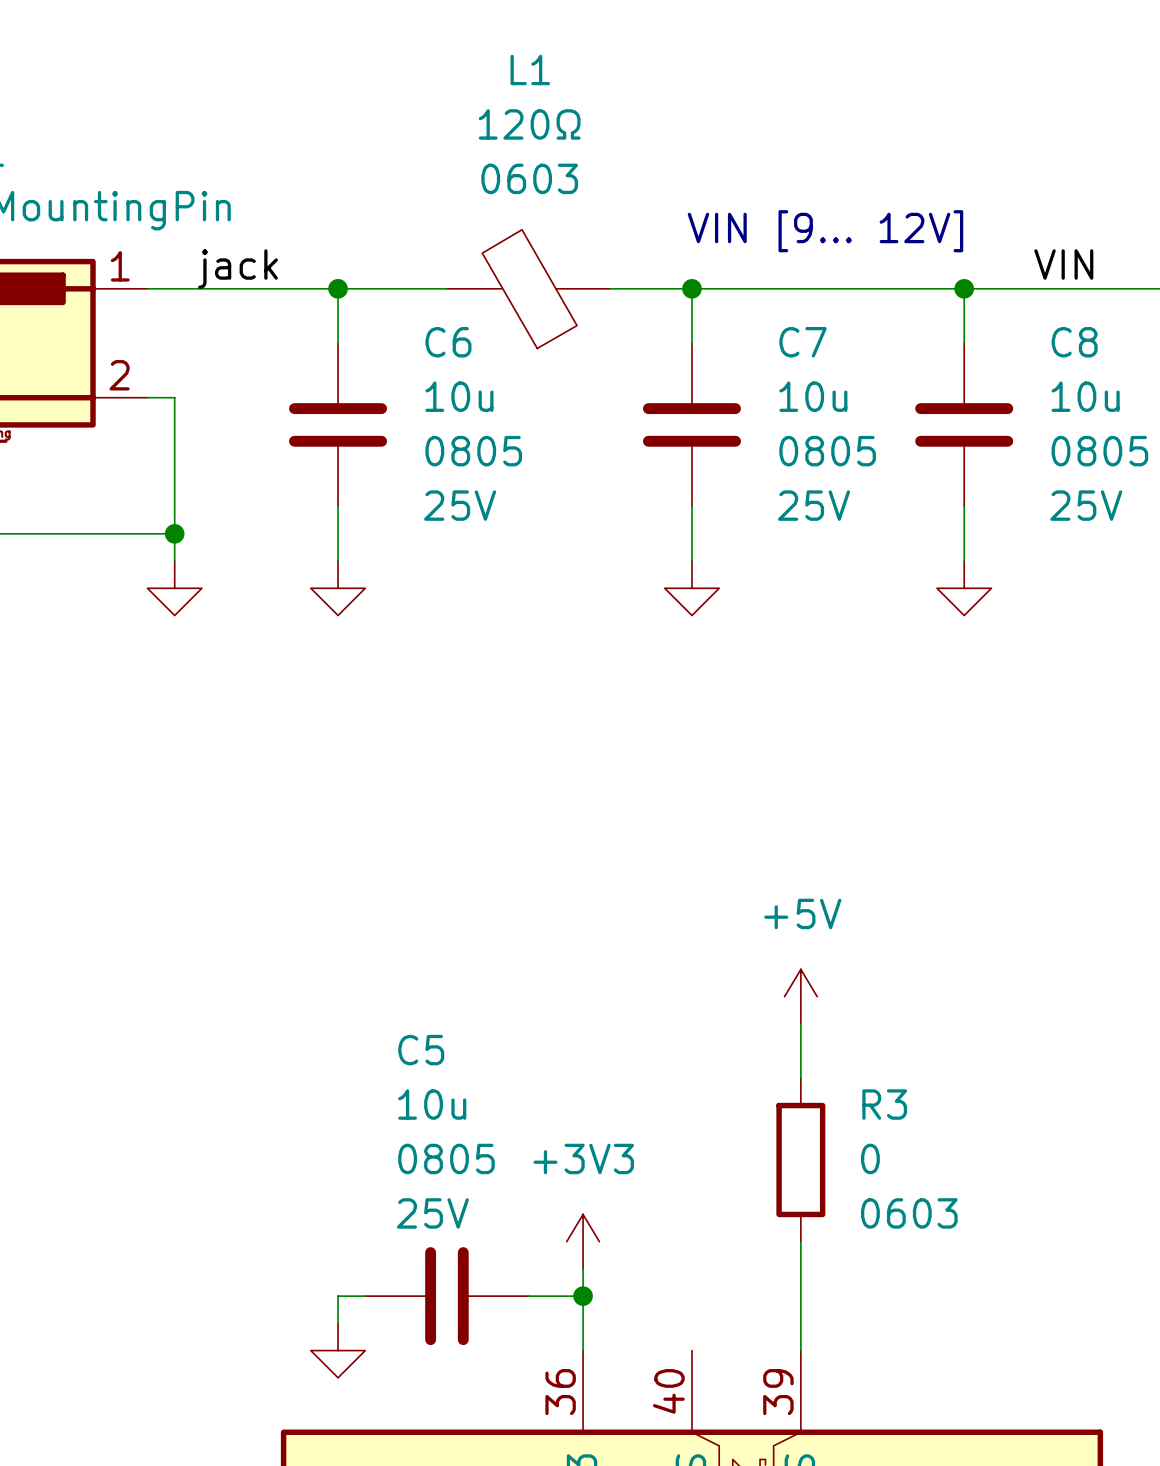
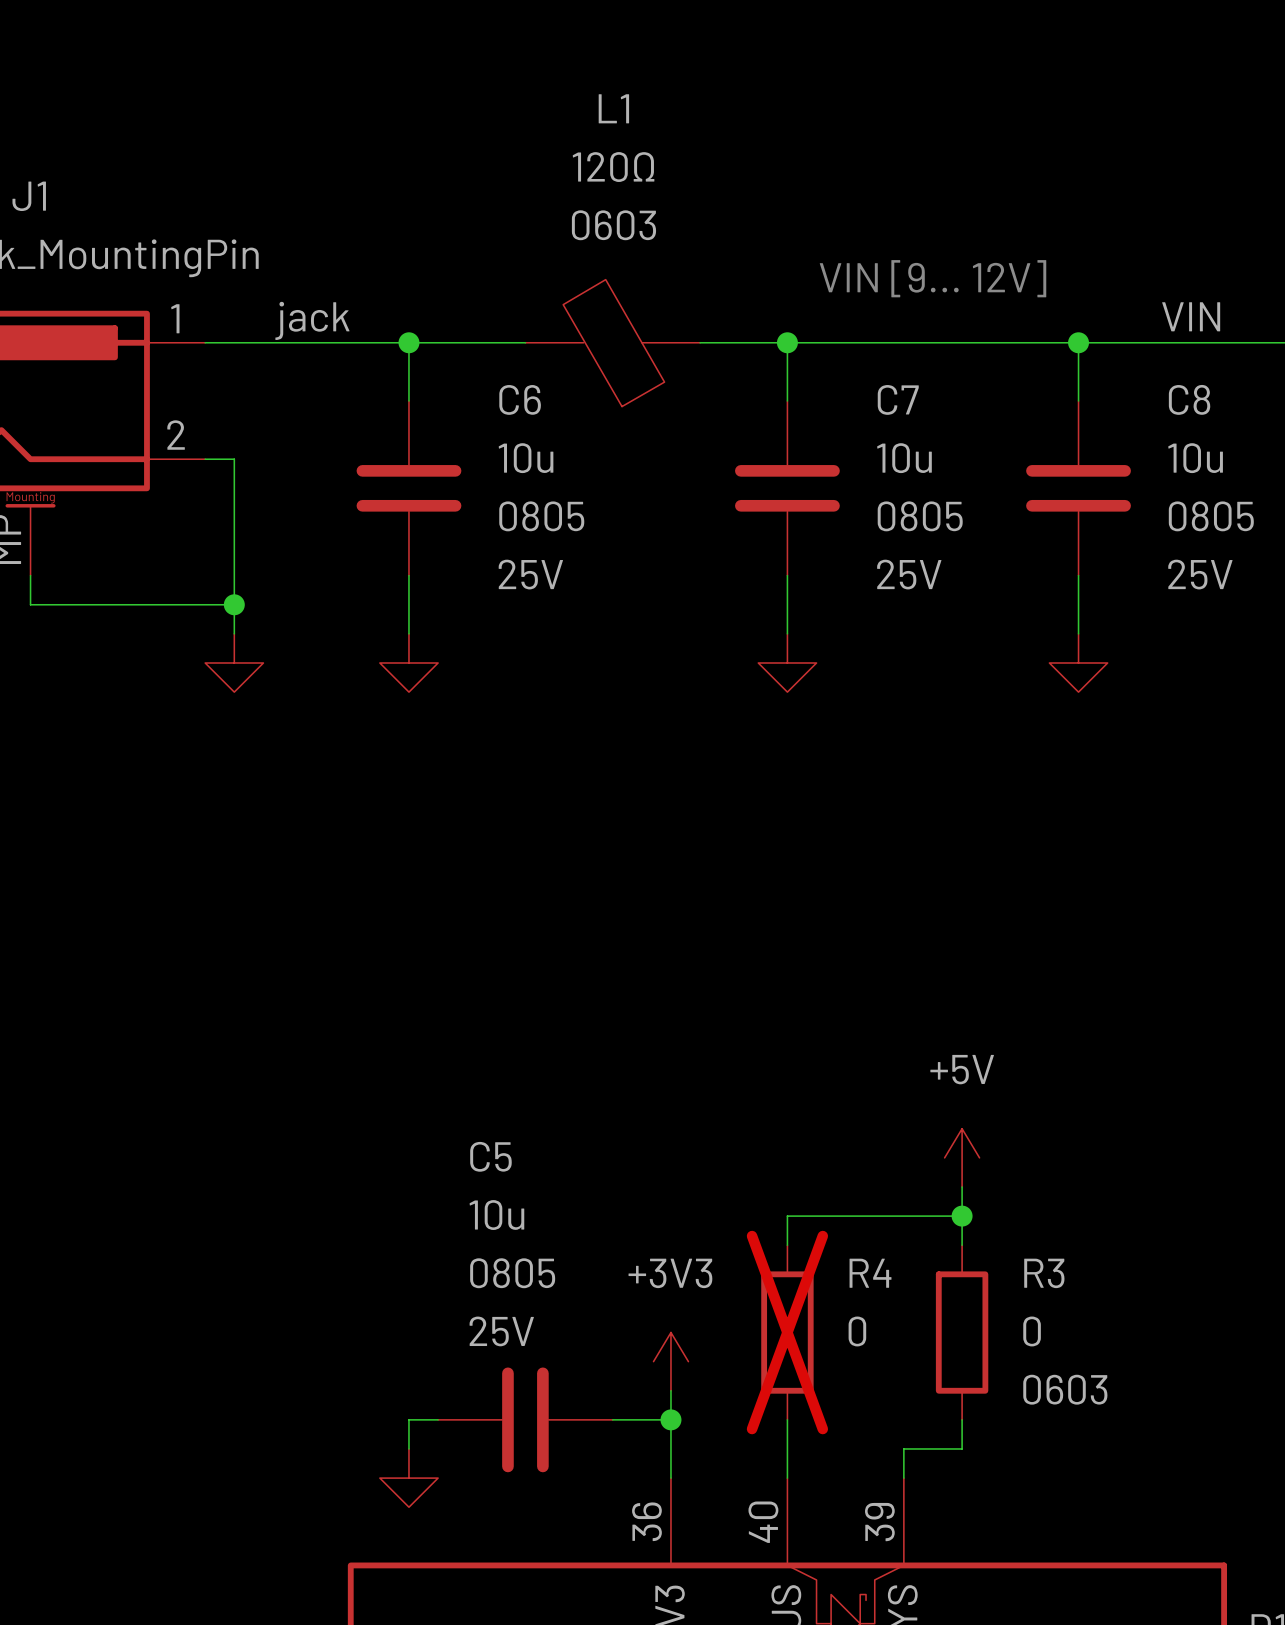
power symbol position: +5V (800, 996) -> +5V (962, 1157)
wire: (800, 1023) (800, 1078) -> (962, 1186) (962, 1245)
wire: none -> (962, 1216) (787, 1216) (787, 1245)
junction: none -> (962, 1216)
R3 position: (800, 1160) -> (962, 1332)
R4: none -> 0 (787, 1332)
wire: (800, 1241) (800, 1323) -> (962, 1419) (962, 1448) (903, 1448)
wire: none -> (787, 1419) (787, 1478)

